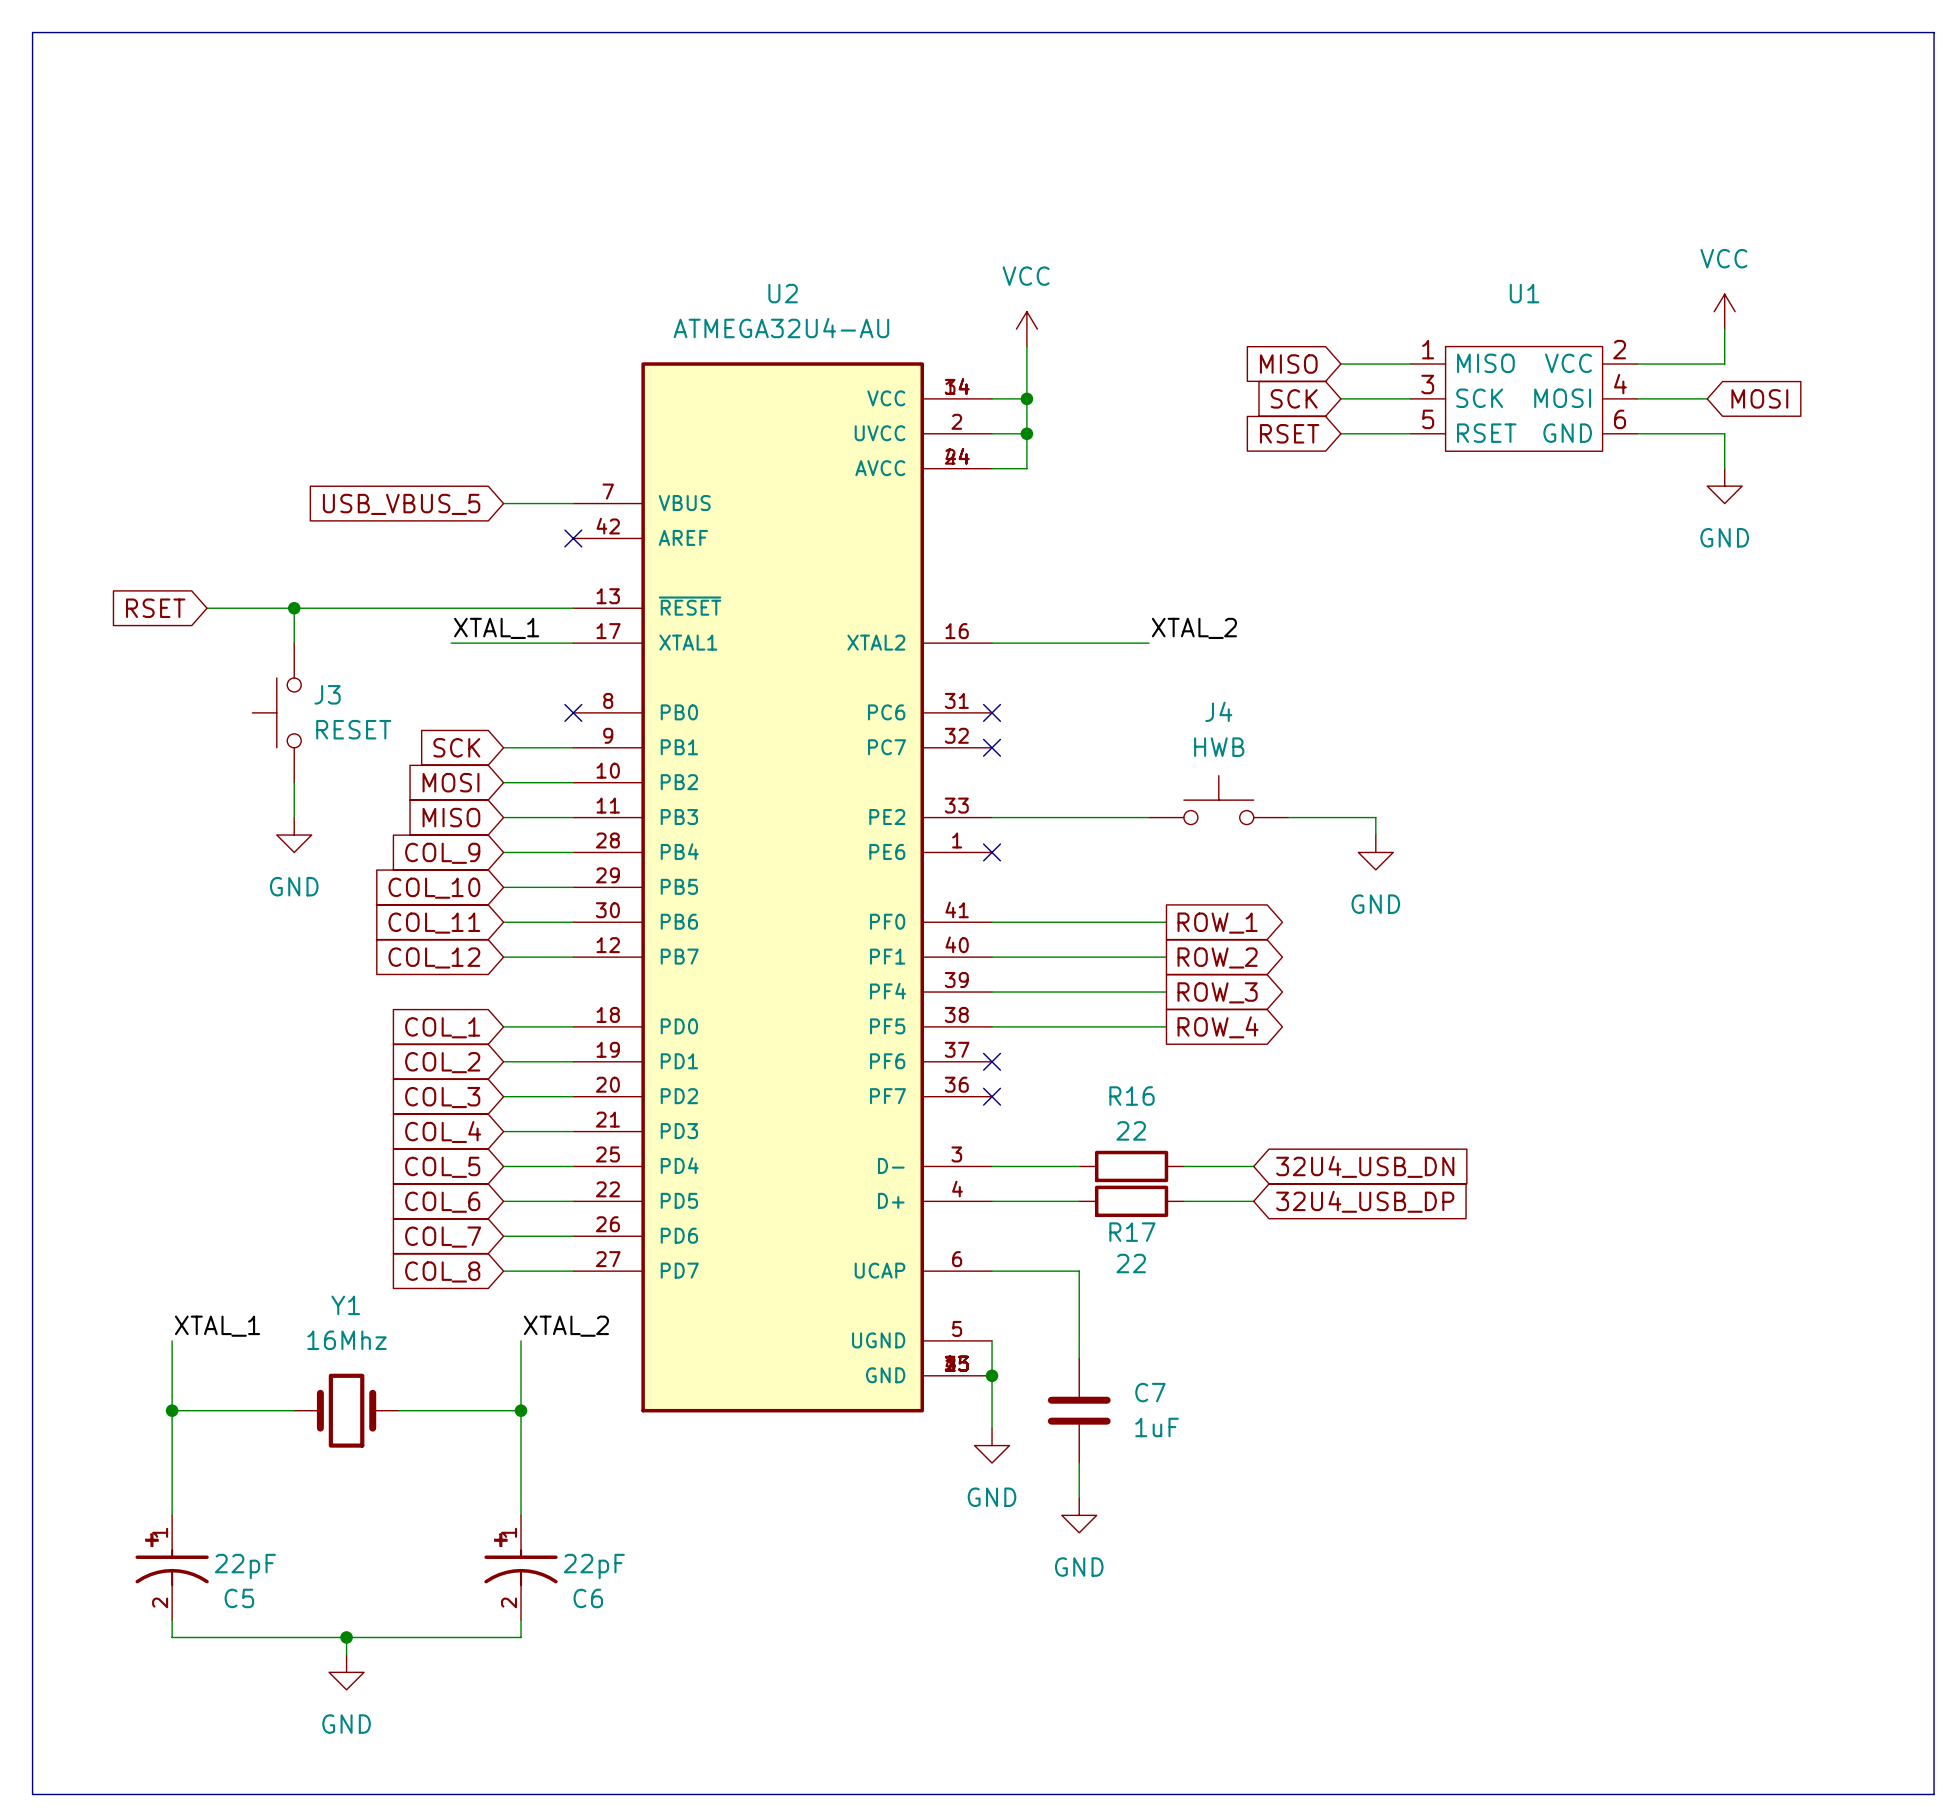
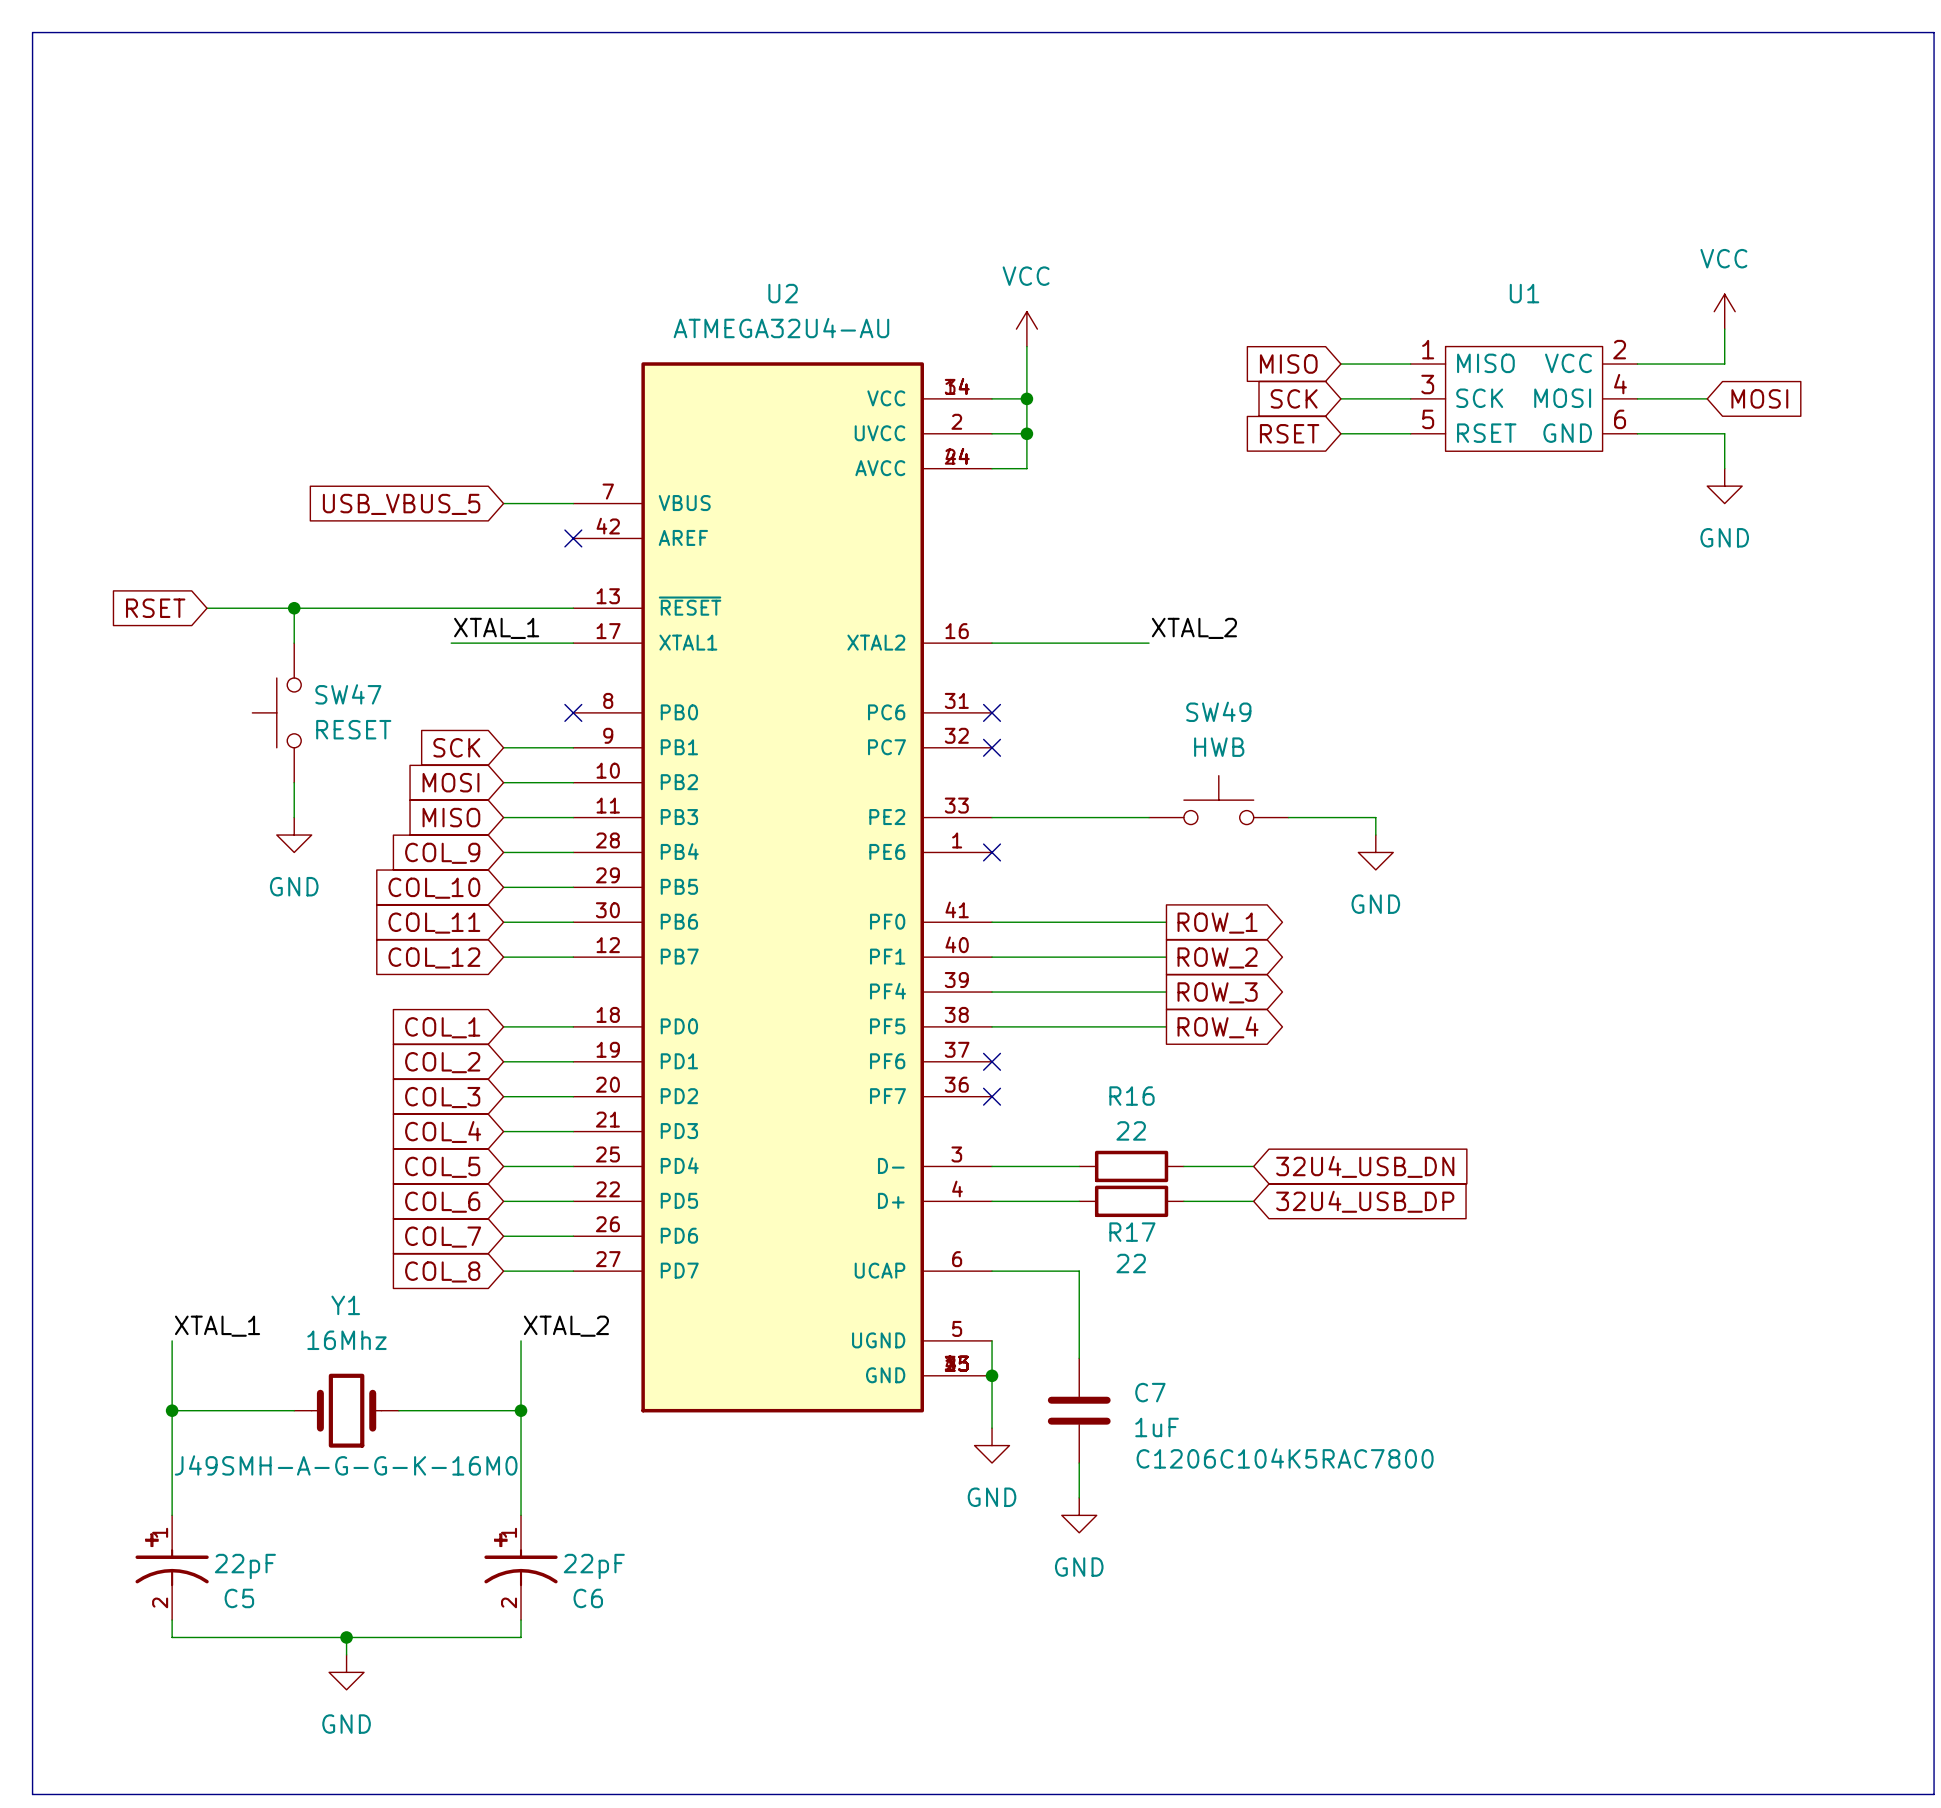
J3 name: J3 (327, 694) -> SW47 (348, 694)
J4 name: J4 (1218, 711) -> SW49 (1218, 711)
C7 text: none -> C1206C104K5RAC7800 (1285, 1458)
Y1 text: none -> J49SMH-A-G-G-K-16M0 (346, 1465)

